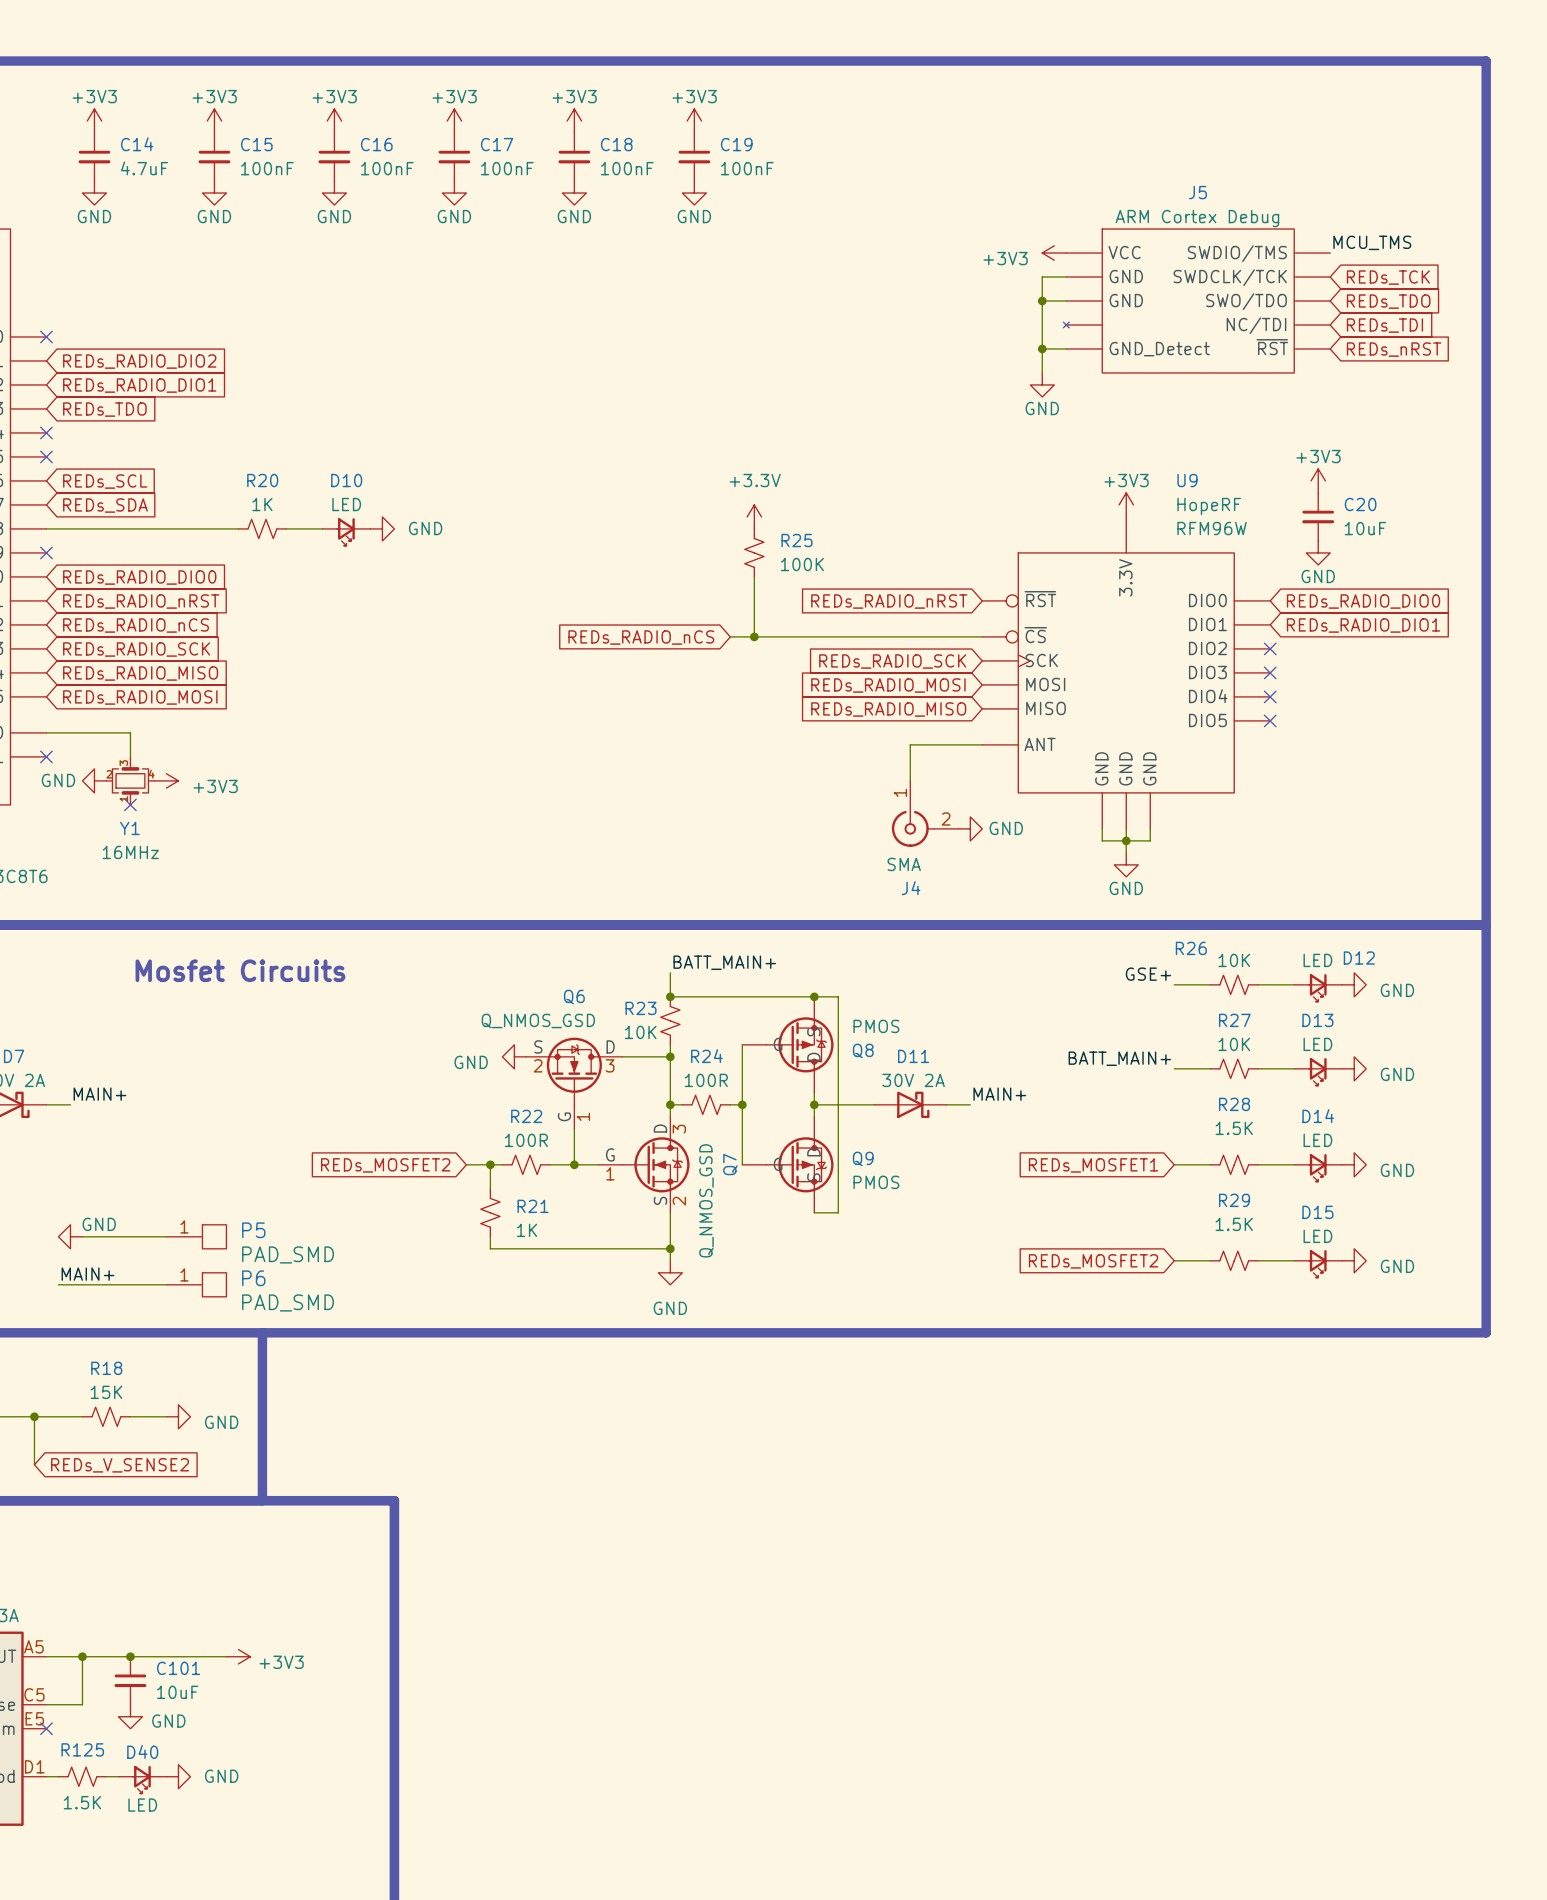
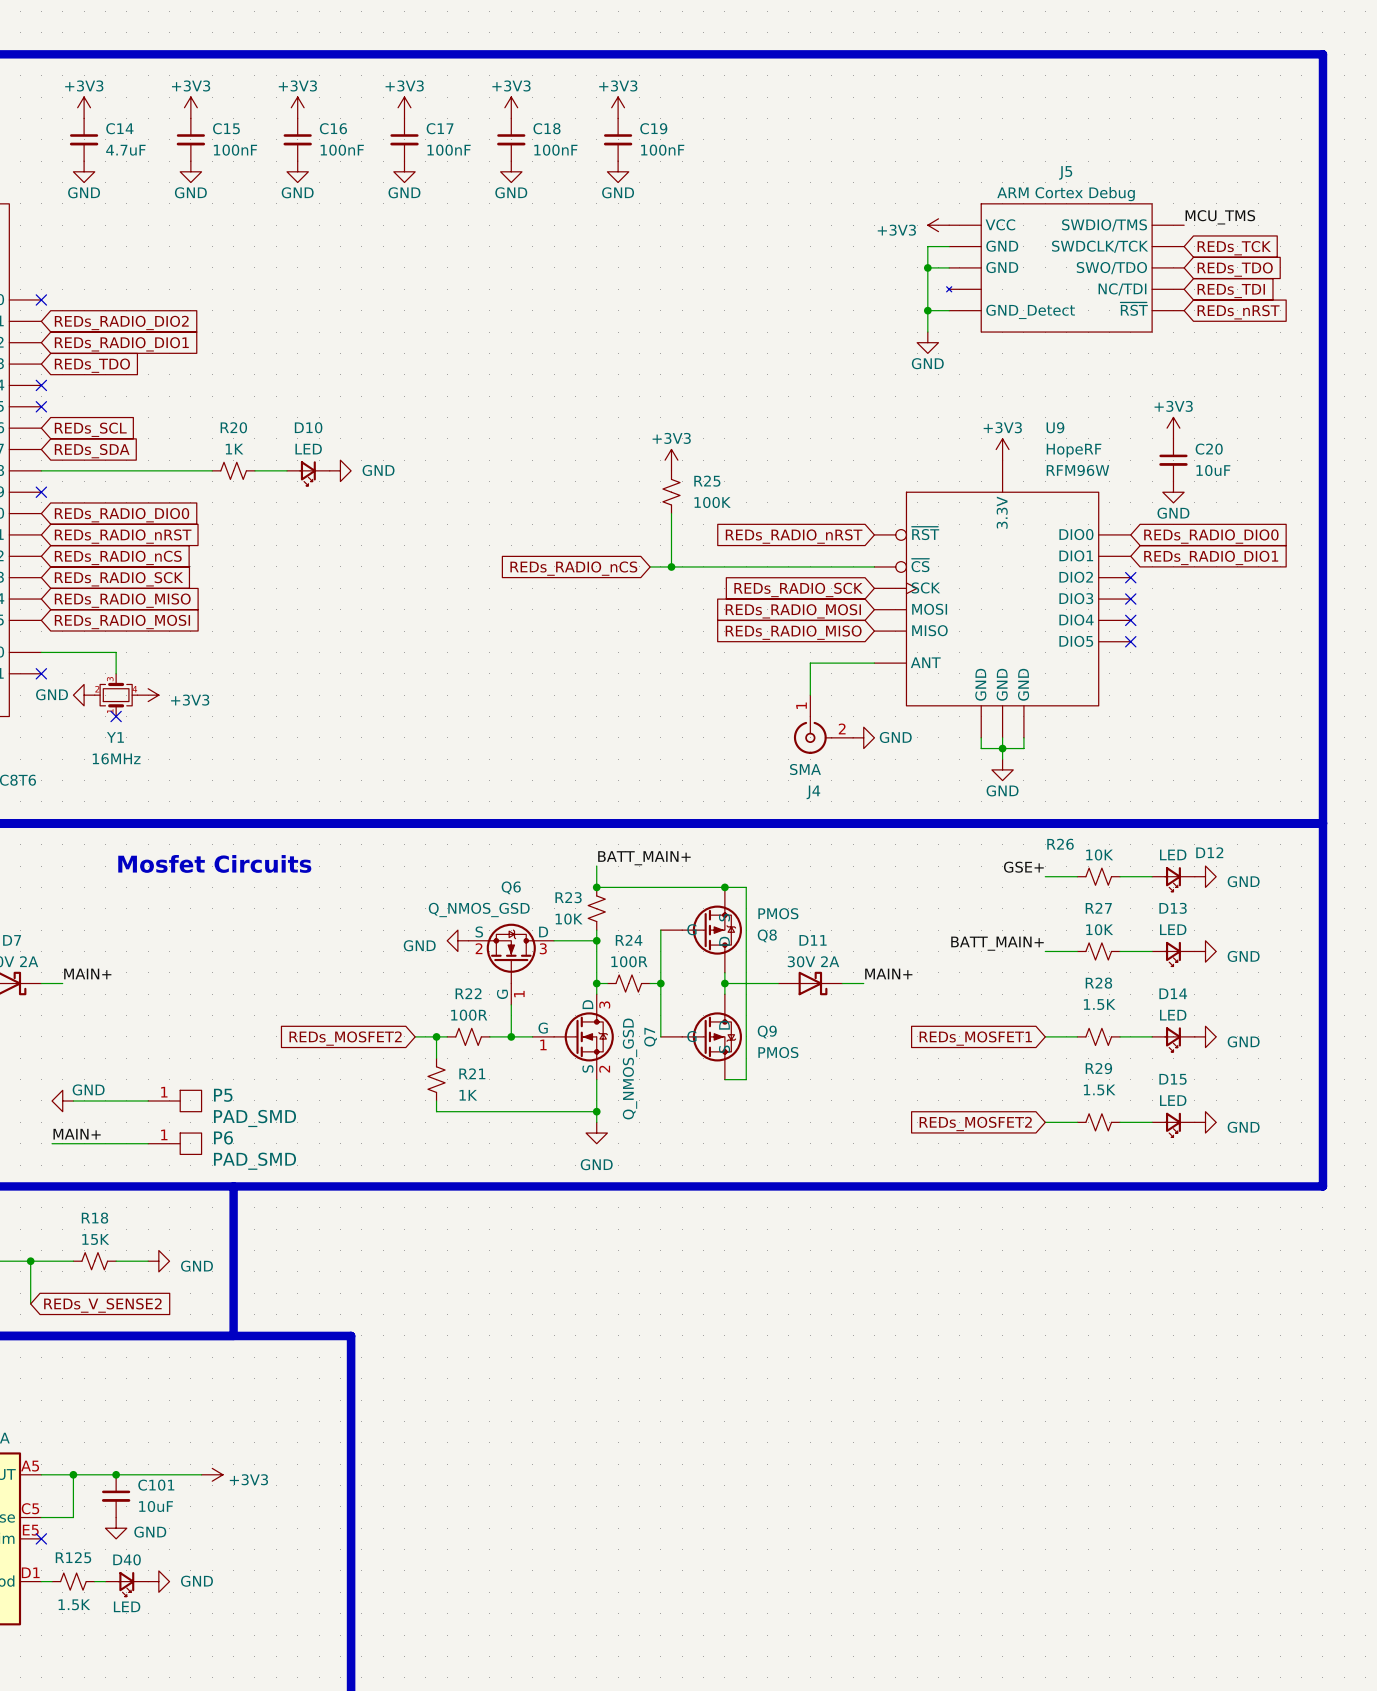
power symbol: +3.3V (754, 516) -> +3V3 (671, 460)

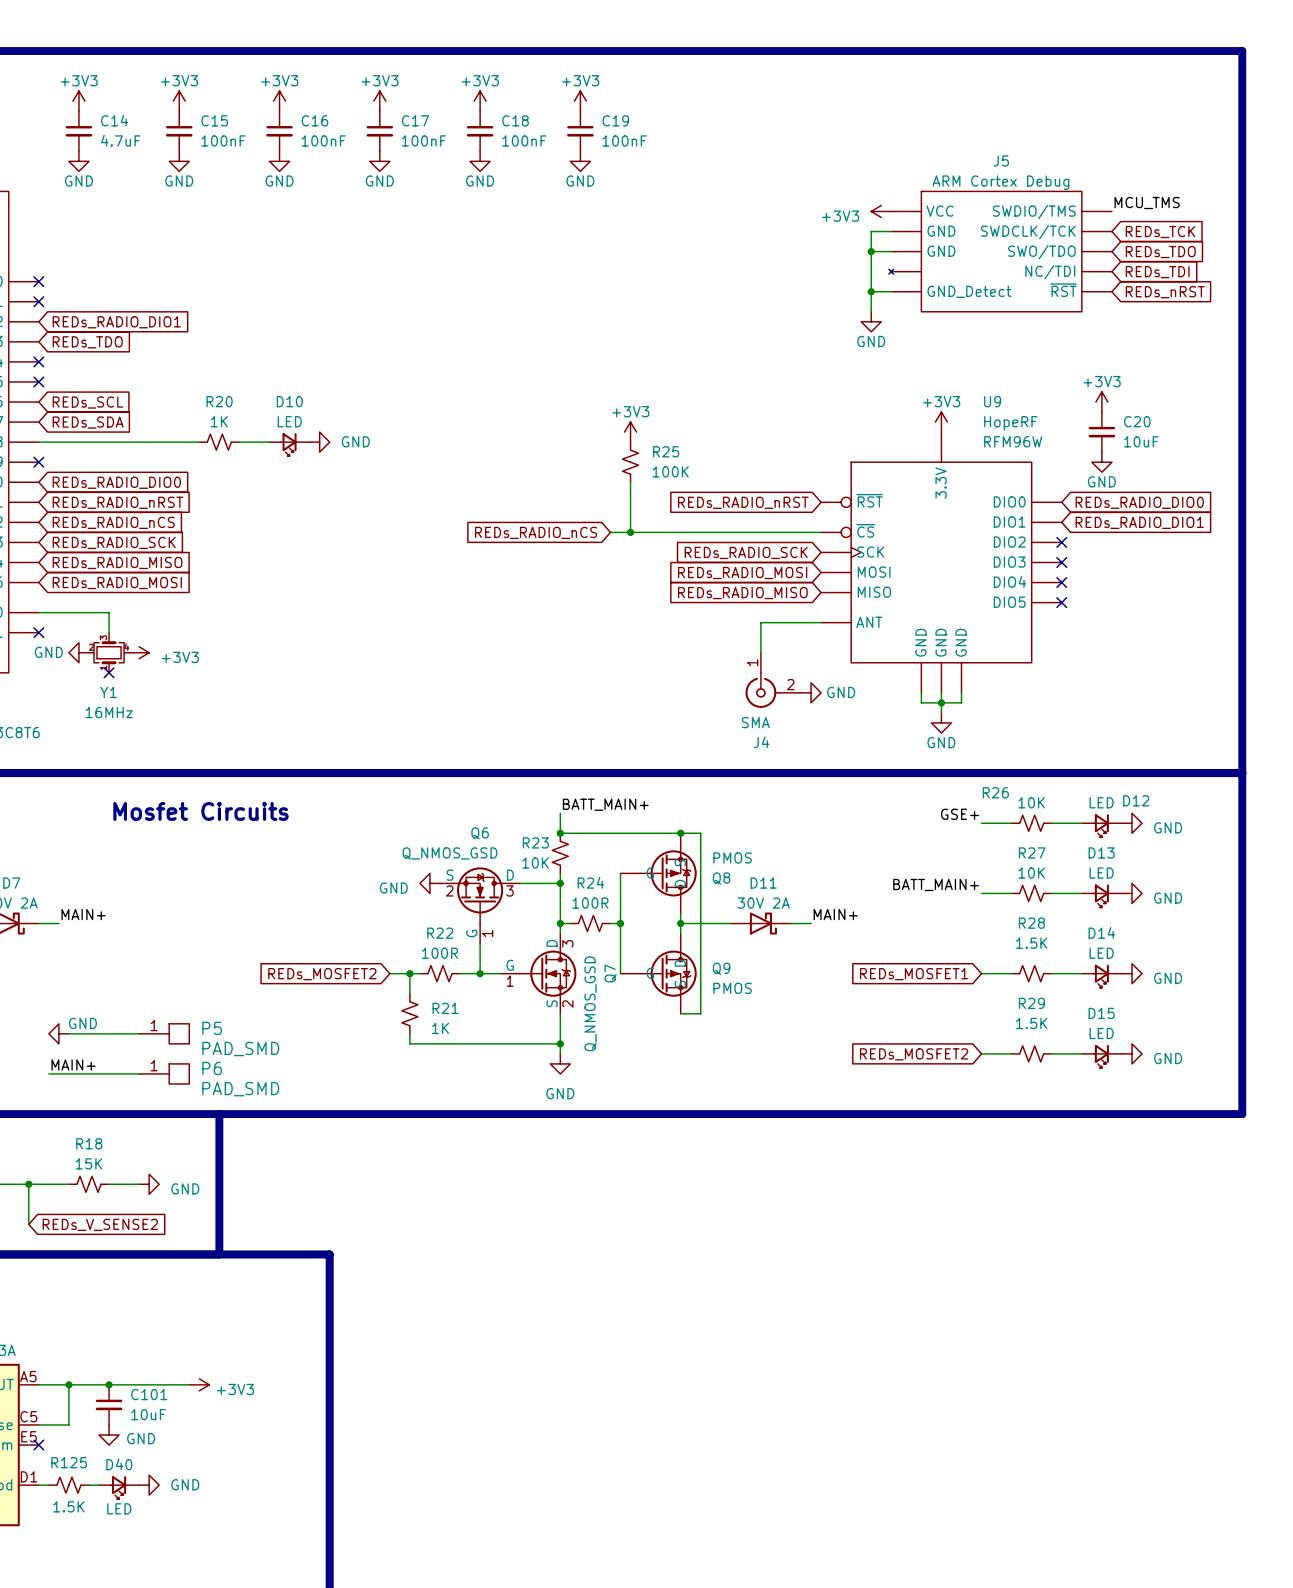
no-connect mark: none -> (38, 301)
global label: REDs_RADIO_DIO2 (121, 322) -> none

